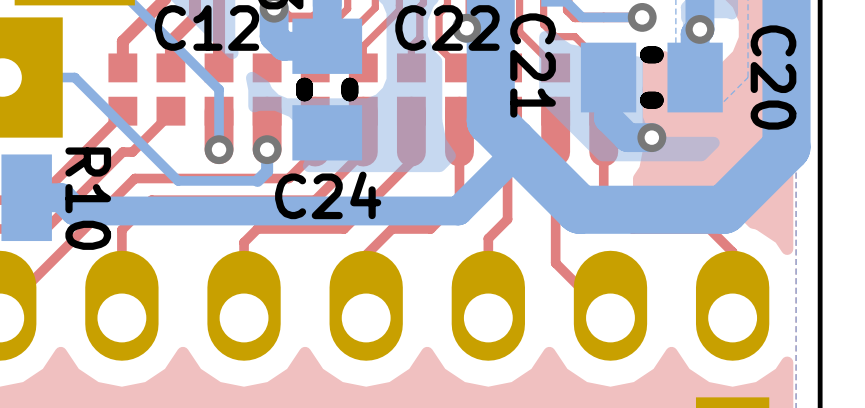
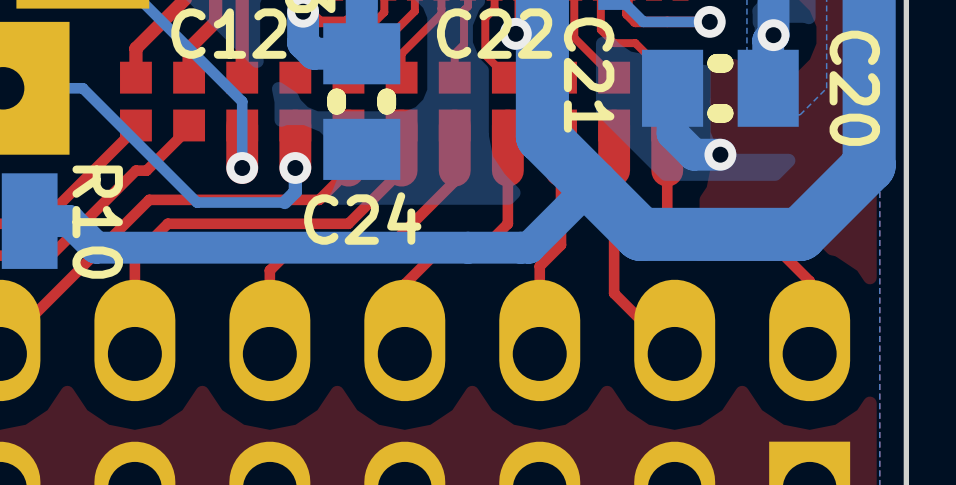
bottom track: (512, 142) (512, 157) (458, 210) (74, 210) (61, 197) -> (591, 185) (529, 247) (96, 247) (68, 221)

